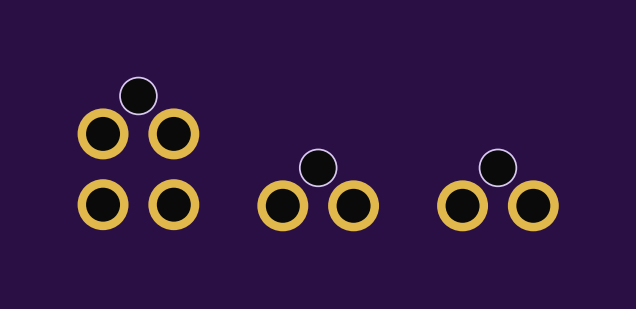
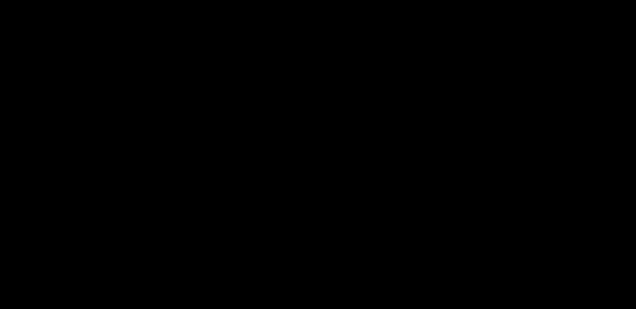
part: (138, 153) -> none
part: (318, 190) -> none
part: (497, 190) -> none

